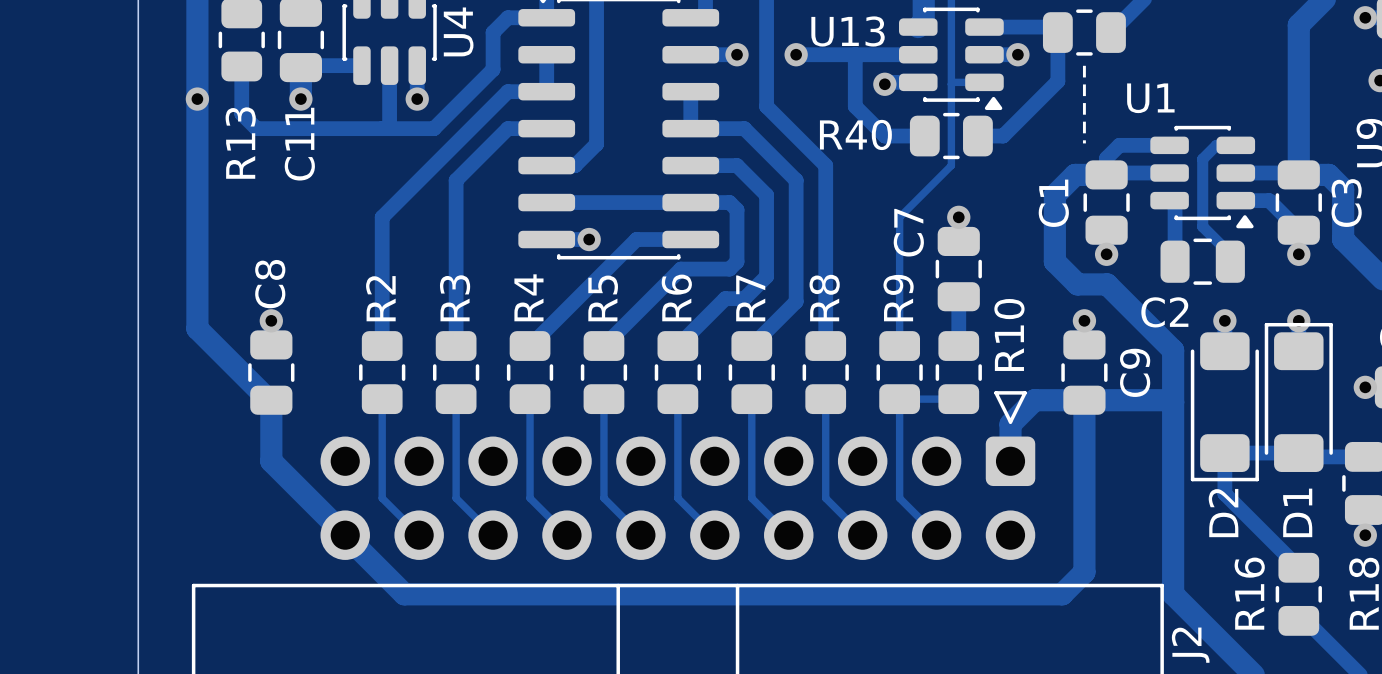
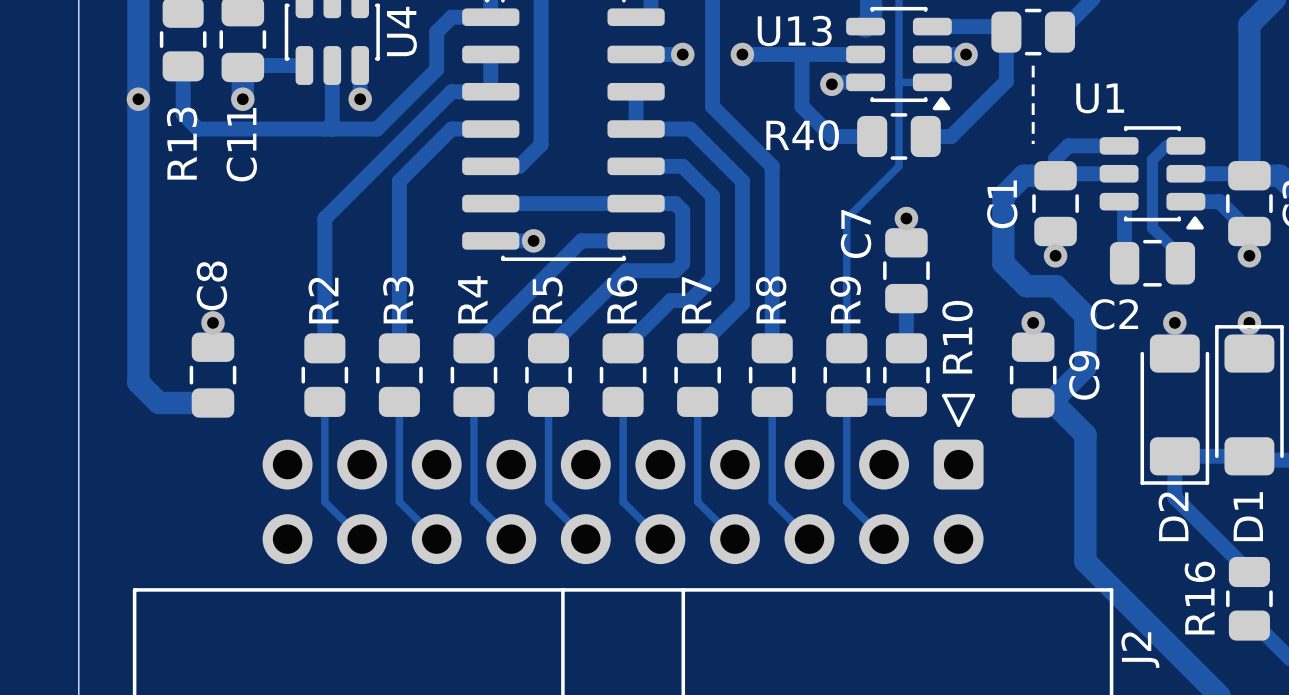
track: (1136, 313) (1173, 350) (1173, 594) -> (1053, 402) (1085, 434) (1085, 561) (1122, 598)
track: none -> (1085, 315) (1085, 367) (1050, 402)
track: (197, 328) (268, 400) -> (138, 330) (138, 382) (158, 402) (210, 402)
track: (271, 400) (271, 461) (404, 594) (1062, 594) (1084, 572) (1084, 400) (1034, 400) (1010, 424) (1010, 461) -> none
track: (1104, 400) (1171, 400) (1173, 402) -> none

